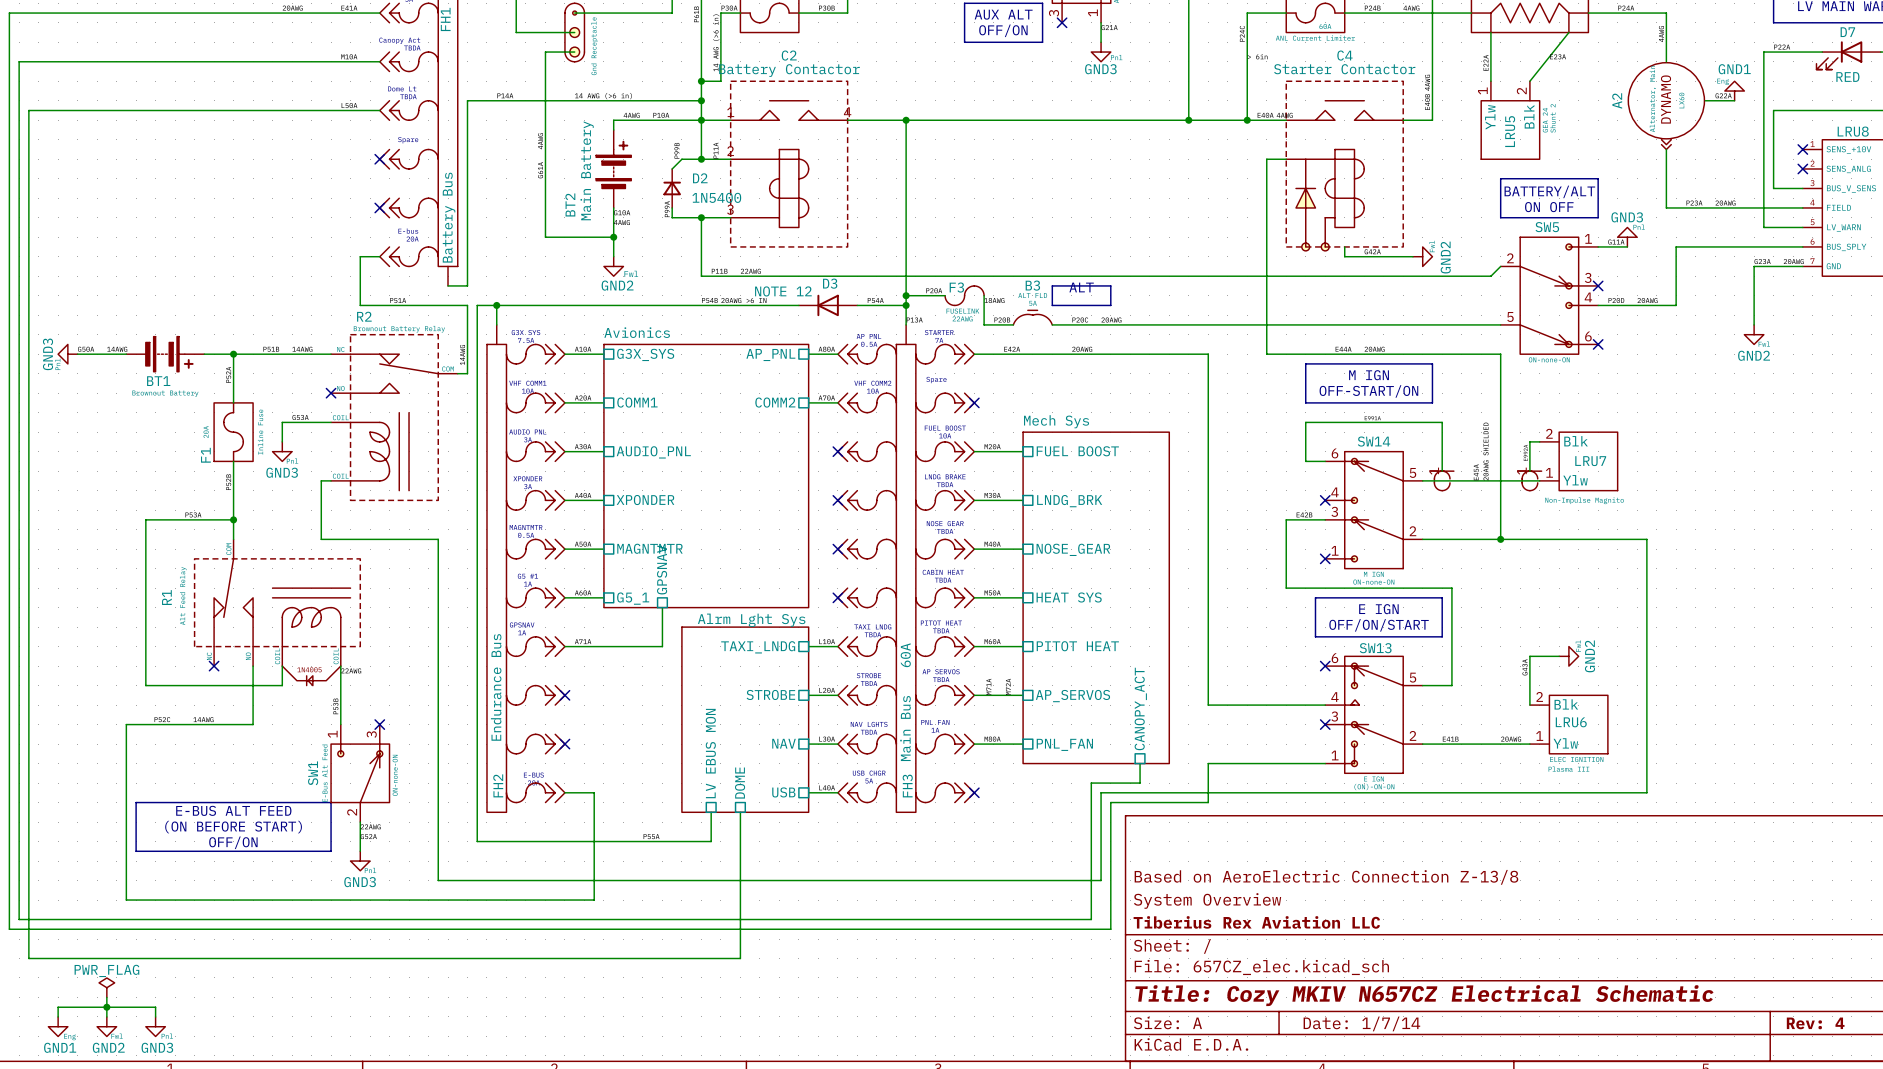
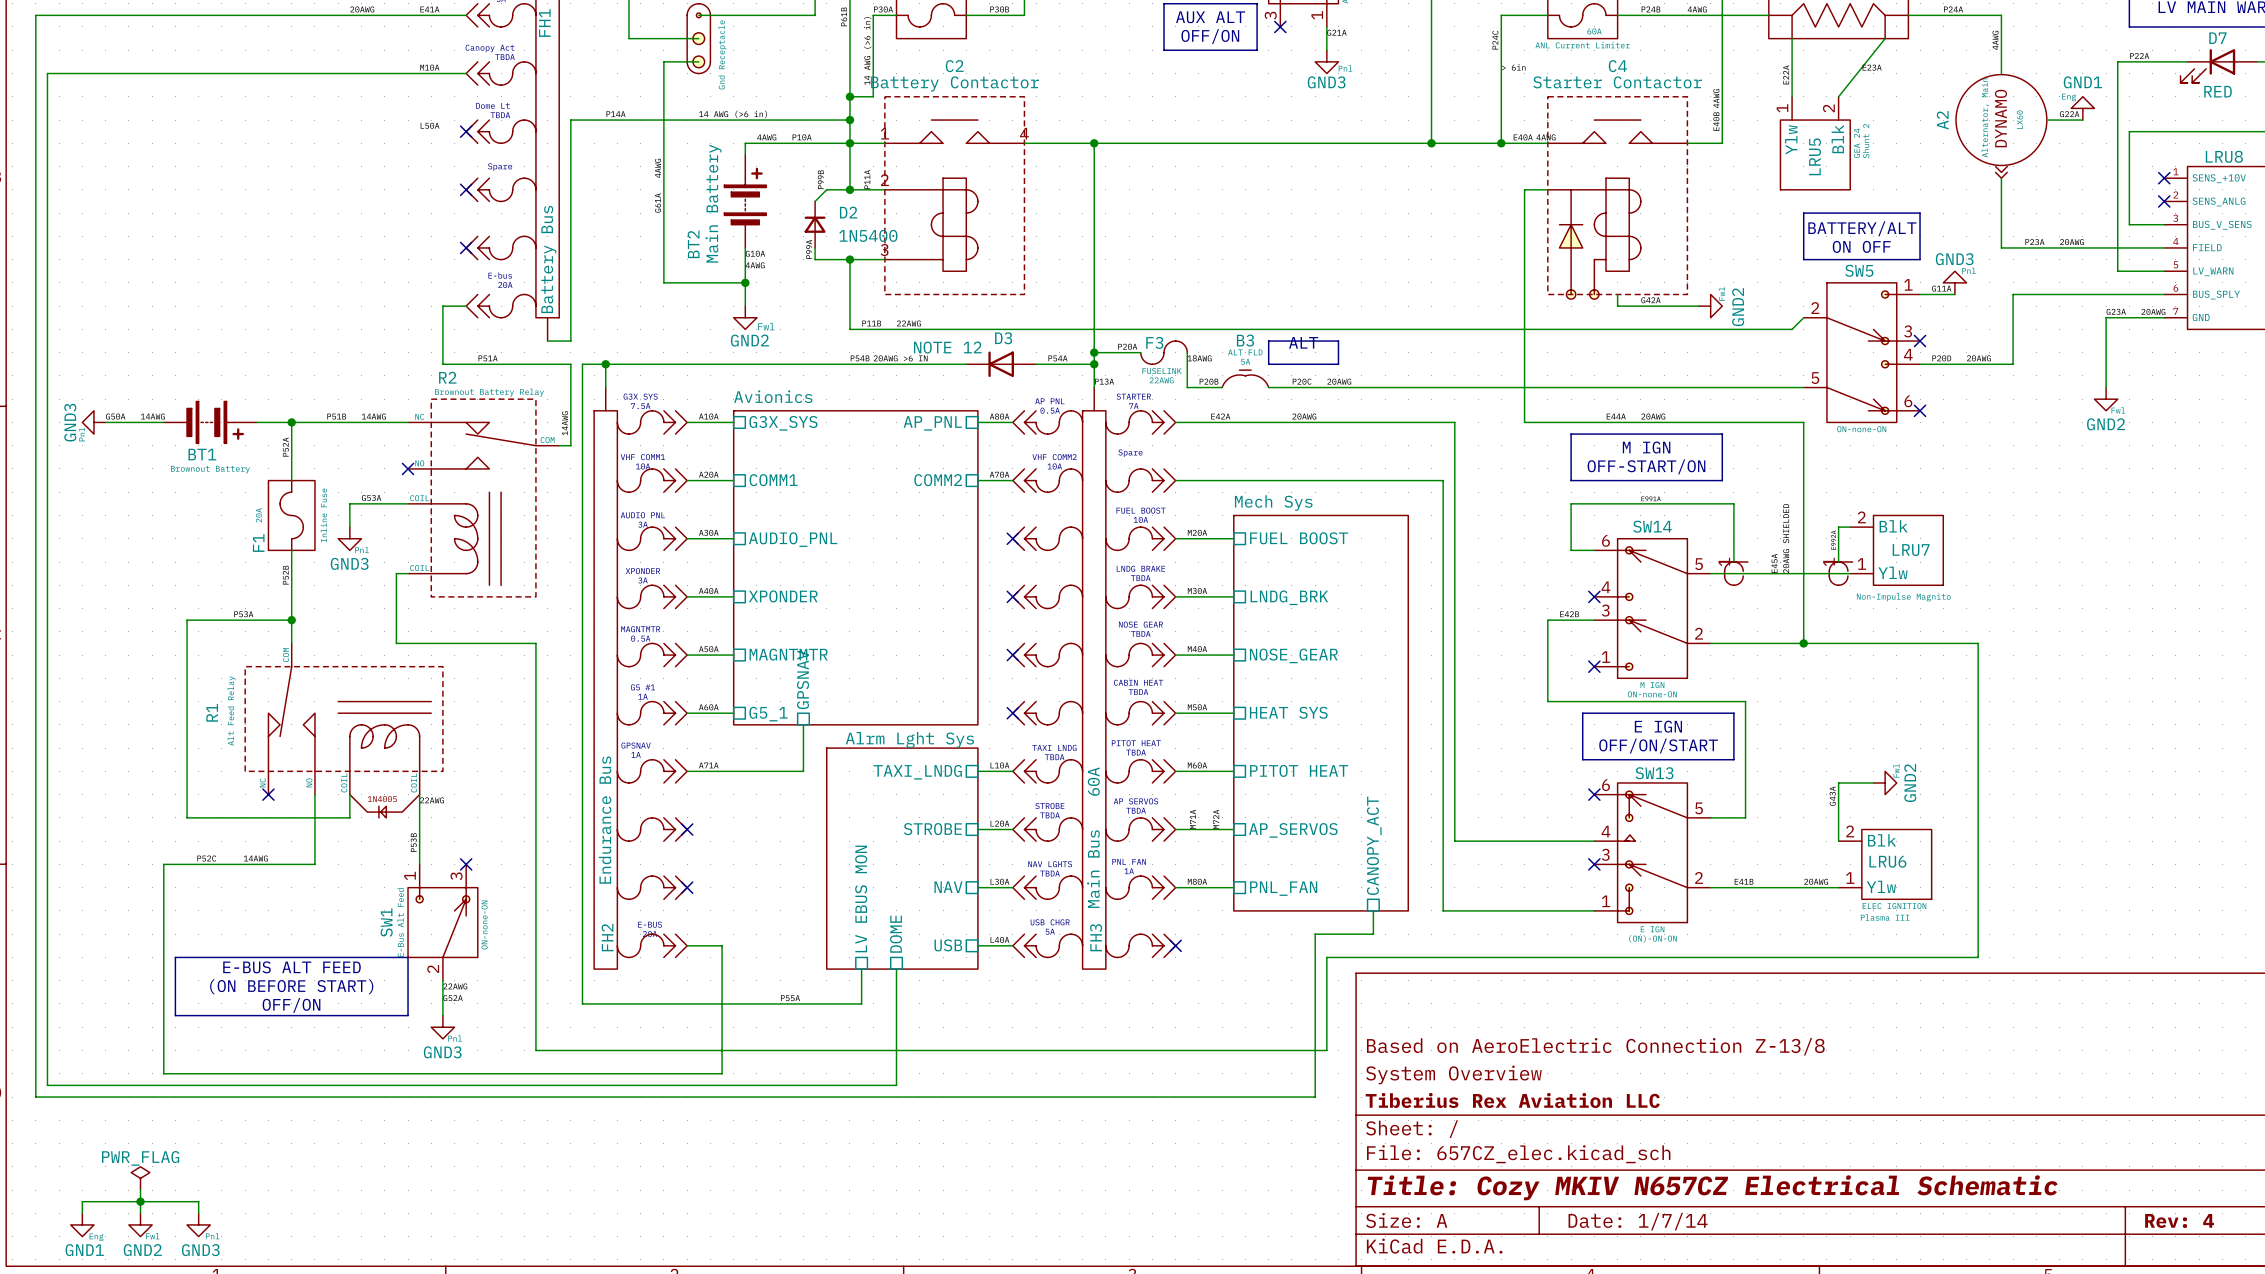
wire: (19, 13) (9, 13) (9, 929) (1110, 929) (1110, 802) -> (1326, 957) (1338, 957)
wire: (19, 61) (28, 61) -> (35, 73) (35, 15)
wire: (28, 110) (379, 110) -> (47, 131) (47, 73)
no-connect mark: none -> (466, 131)
no-connect mark: (974, 402) -> none
wire: (1208, 763) (1208, 802) -> (1454, 910) (1443, 910) (1443, 480) (1175, 480)
wire: (1646, 792) (1101, 792) (1101, 802) -> (1978, 945) (1978, 957) (1454, 957)
wire: (28, 909) (28, 958) (740, 958) (740, 909) -> (47, 1085) (896, 1085)

